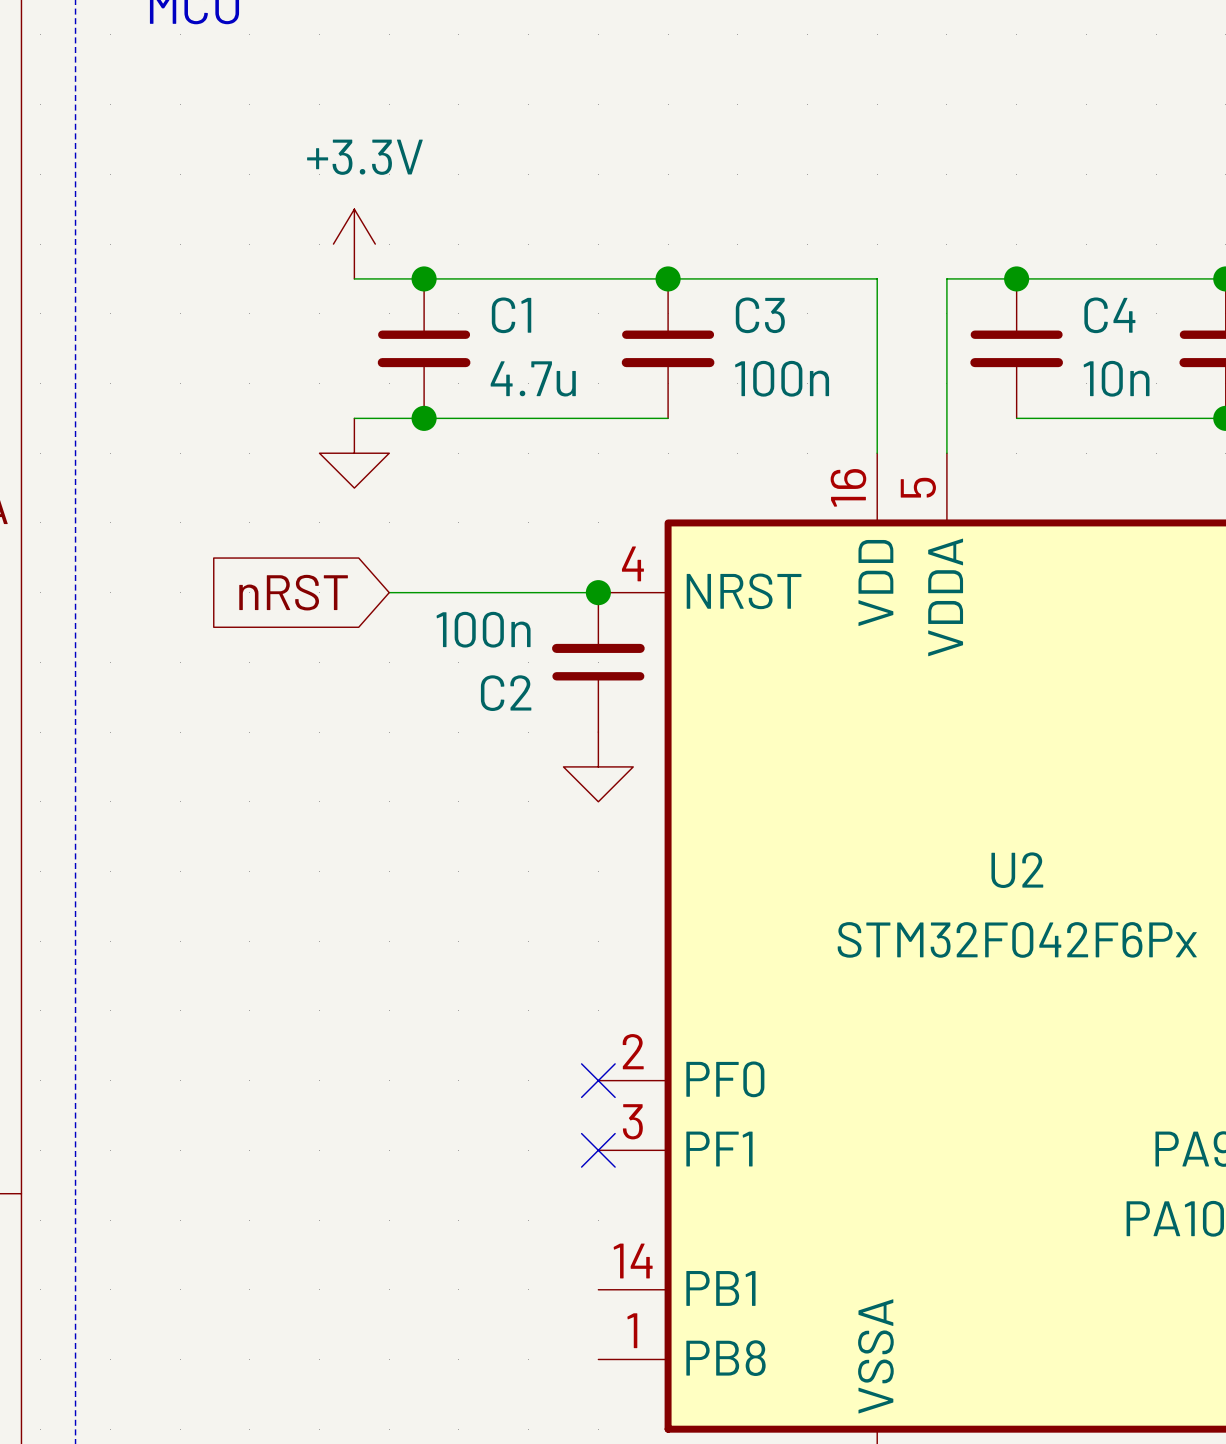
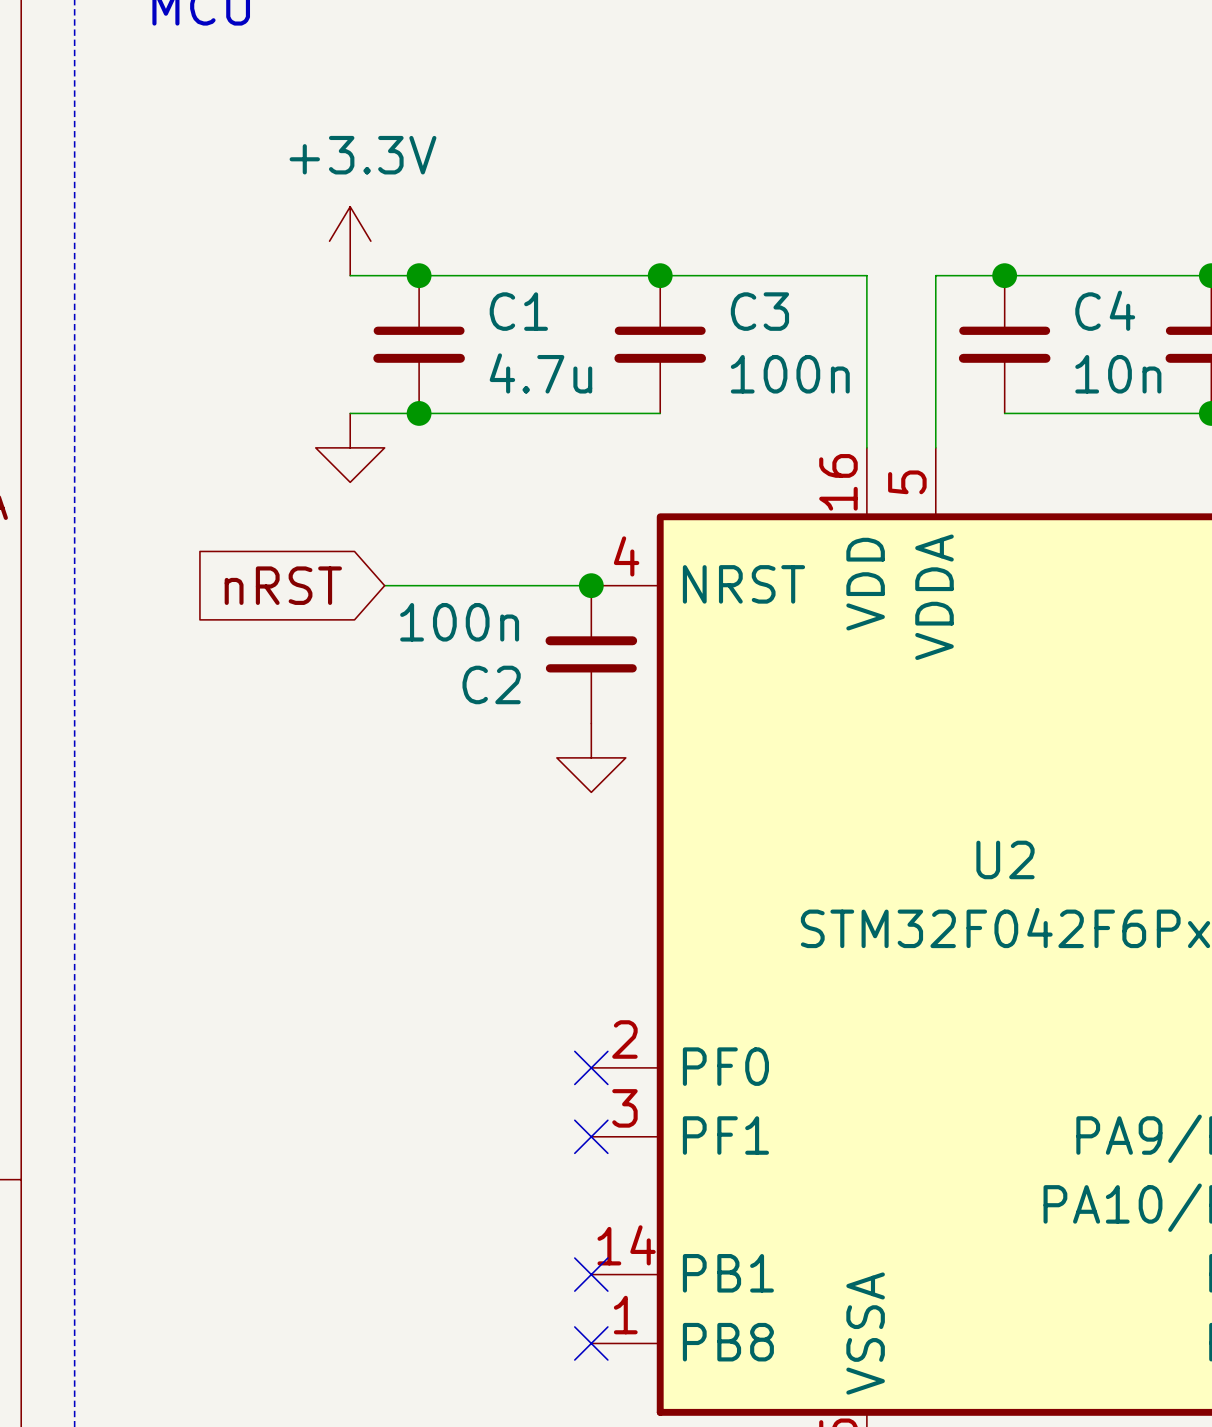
no-connect mark: none -> (591, 1274)
no-connect mark: none -> (591, 1343)

